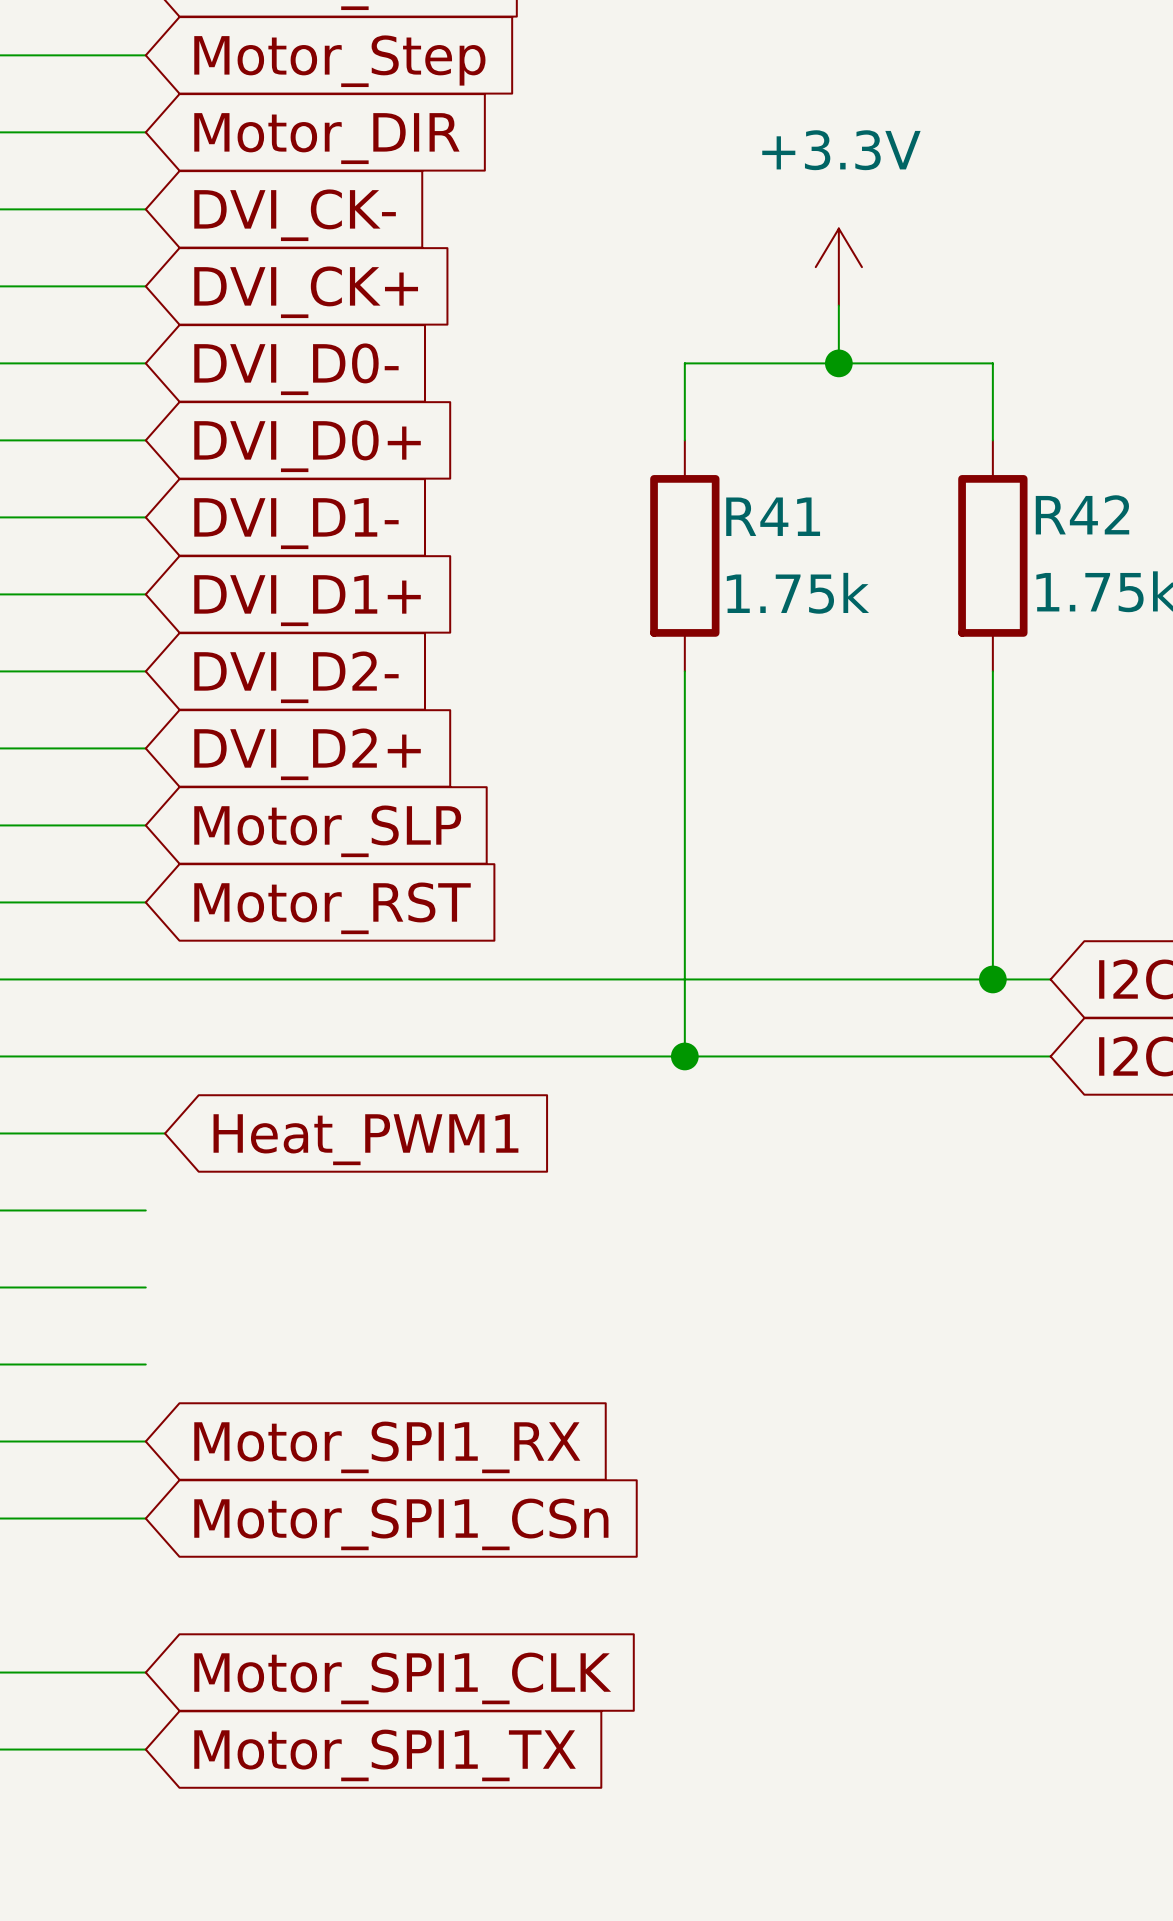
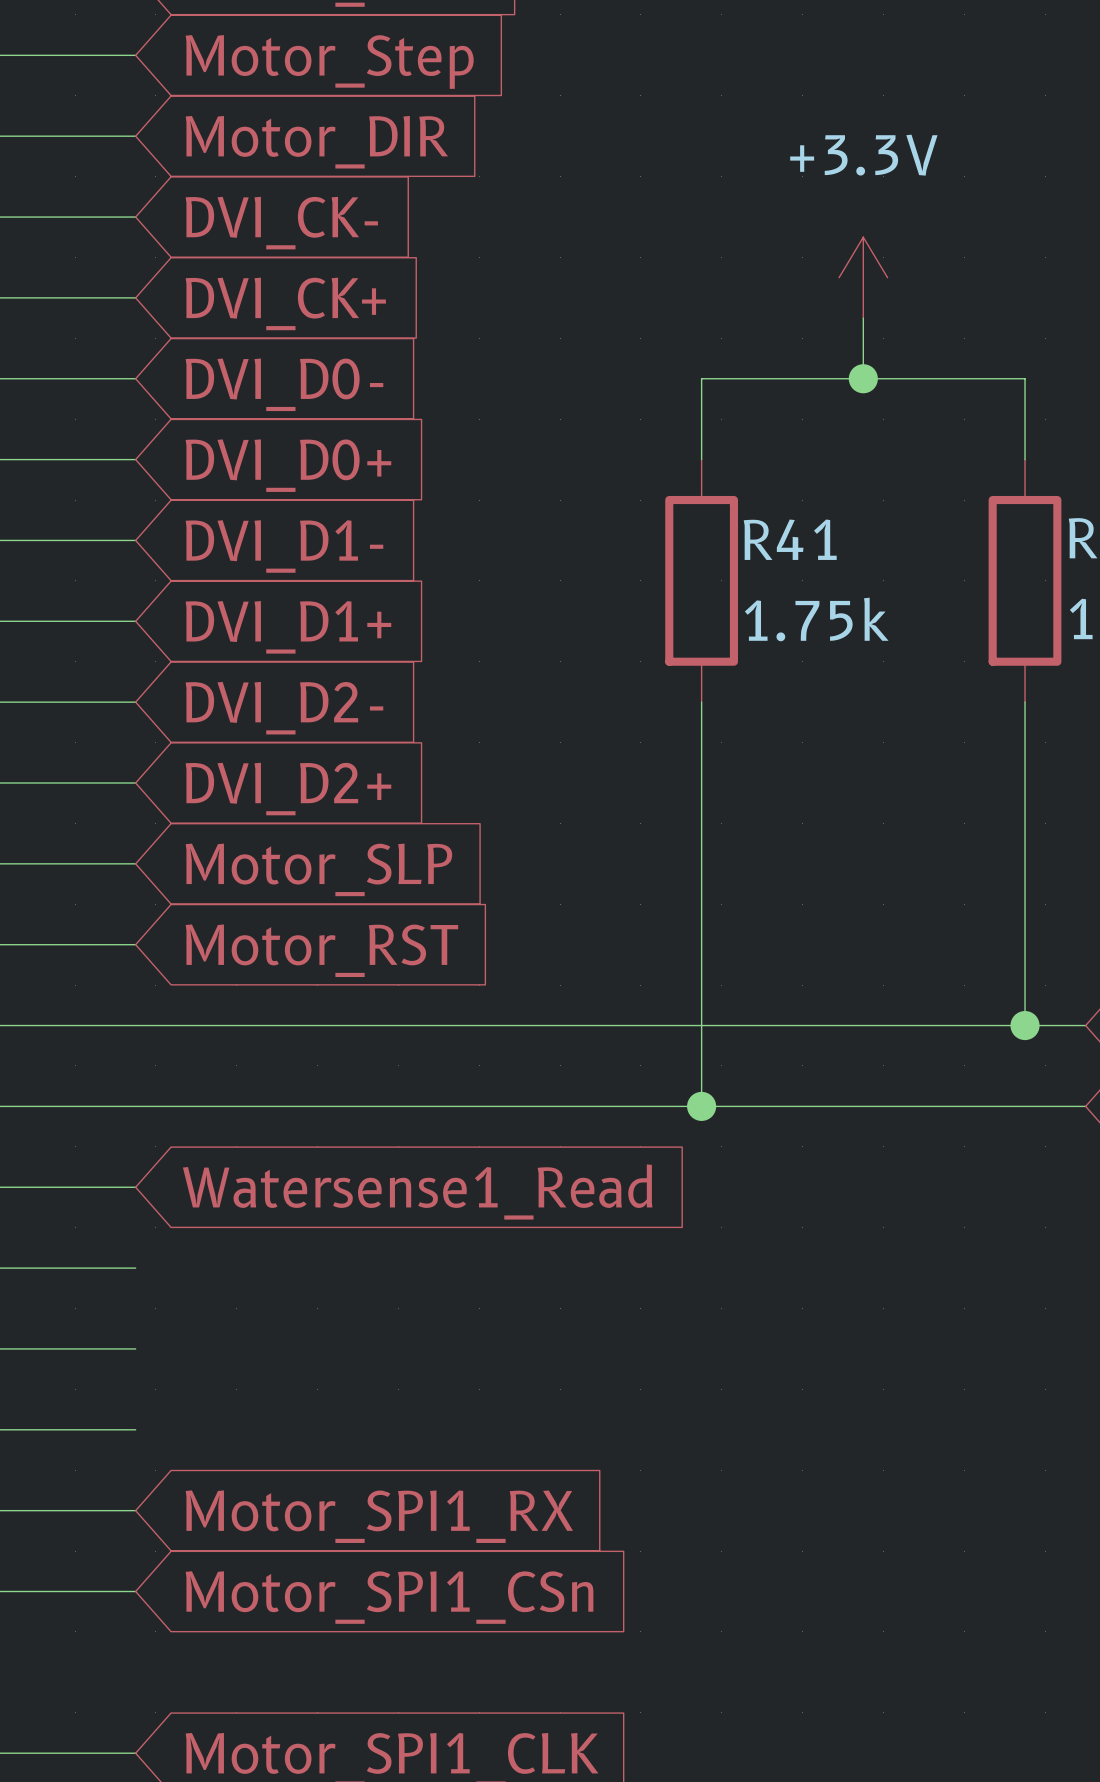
wire: (145, 1133) (165, 1133) -> none
global label: Heat_PWM1 (365, 1139) -> Watersense1_Read (417, 1191)

